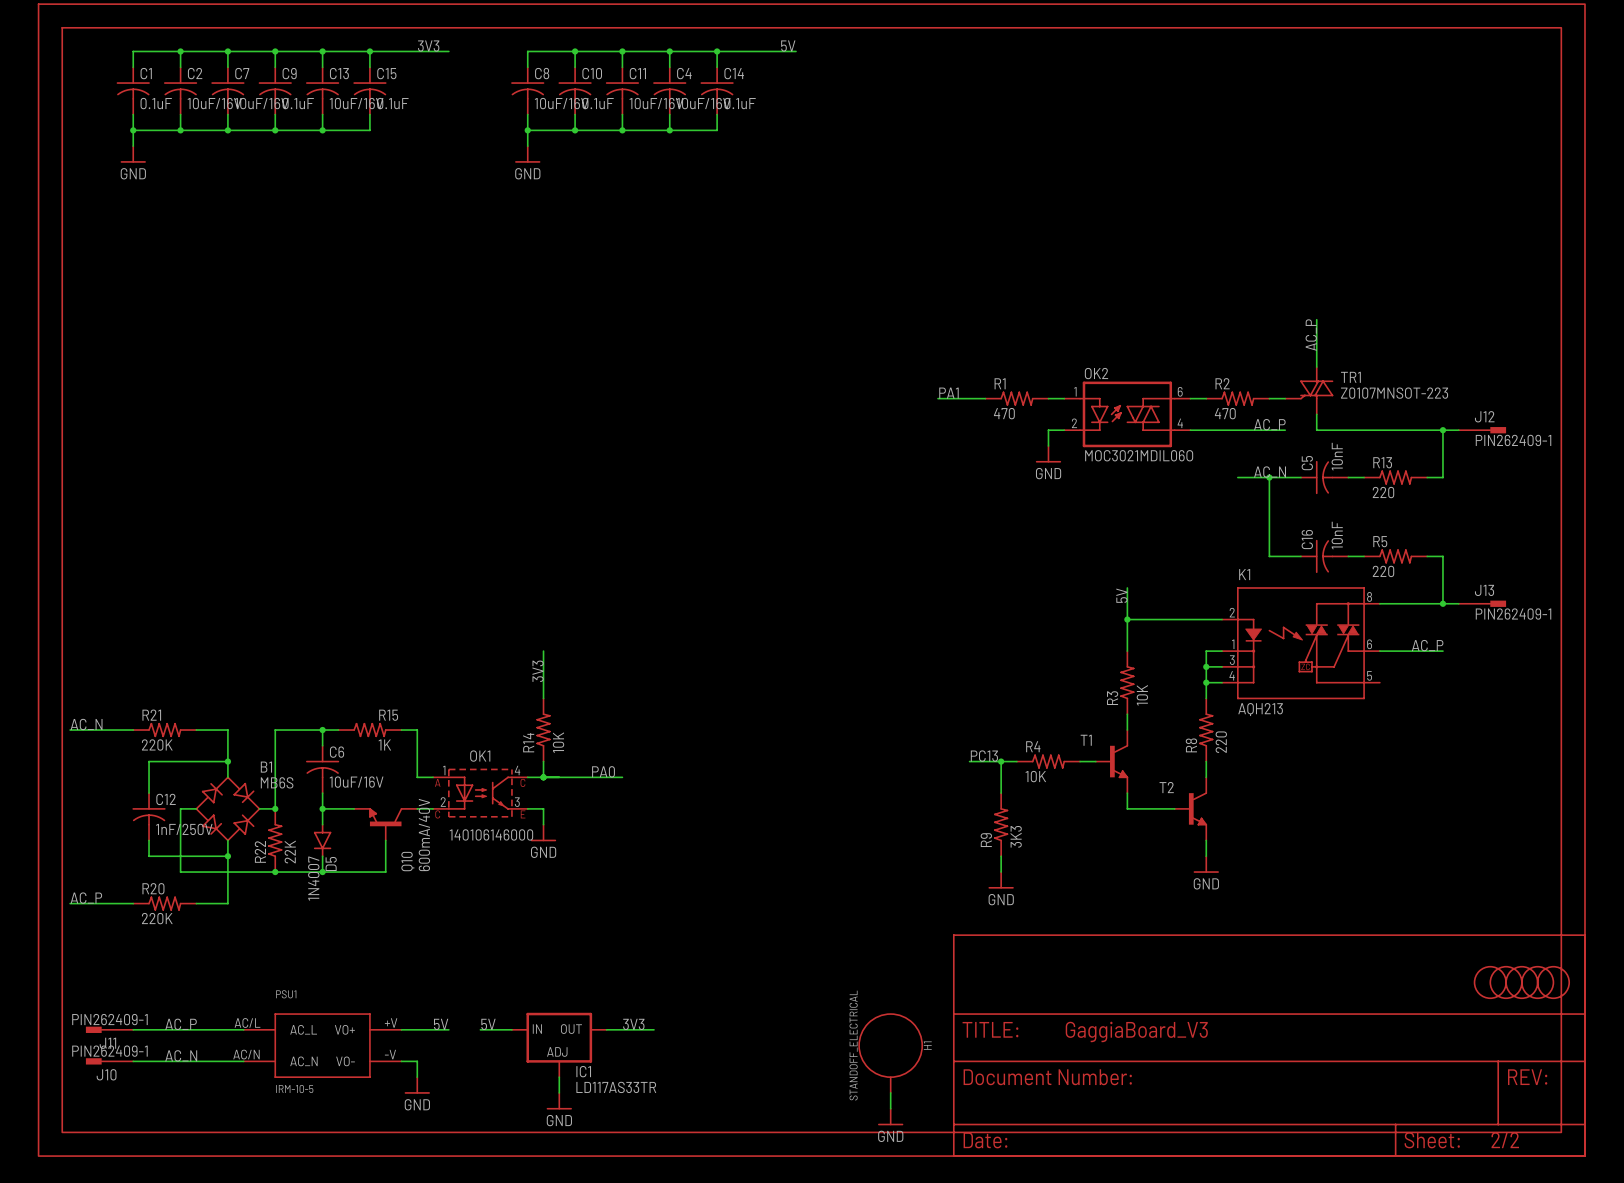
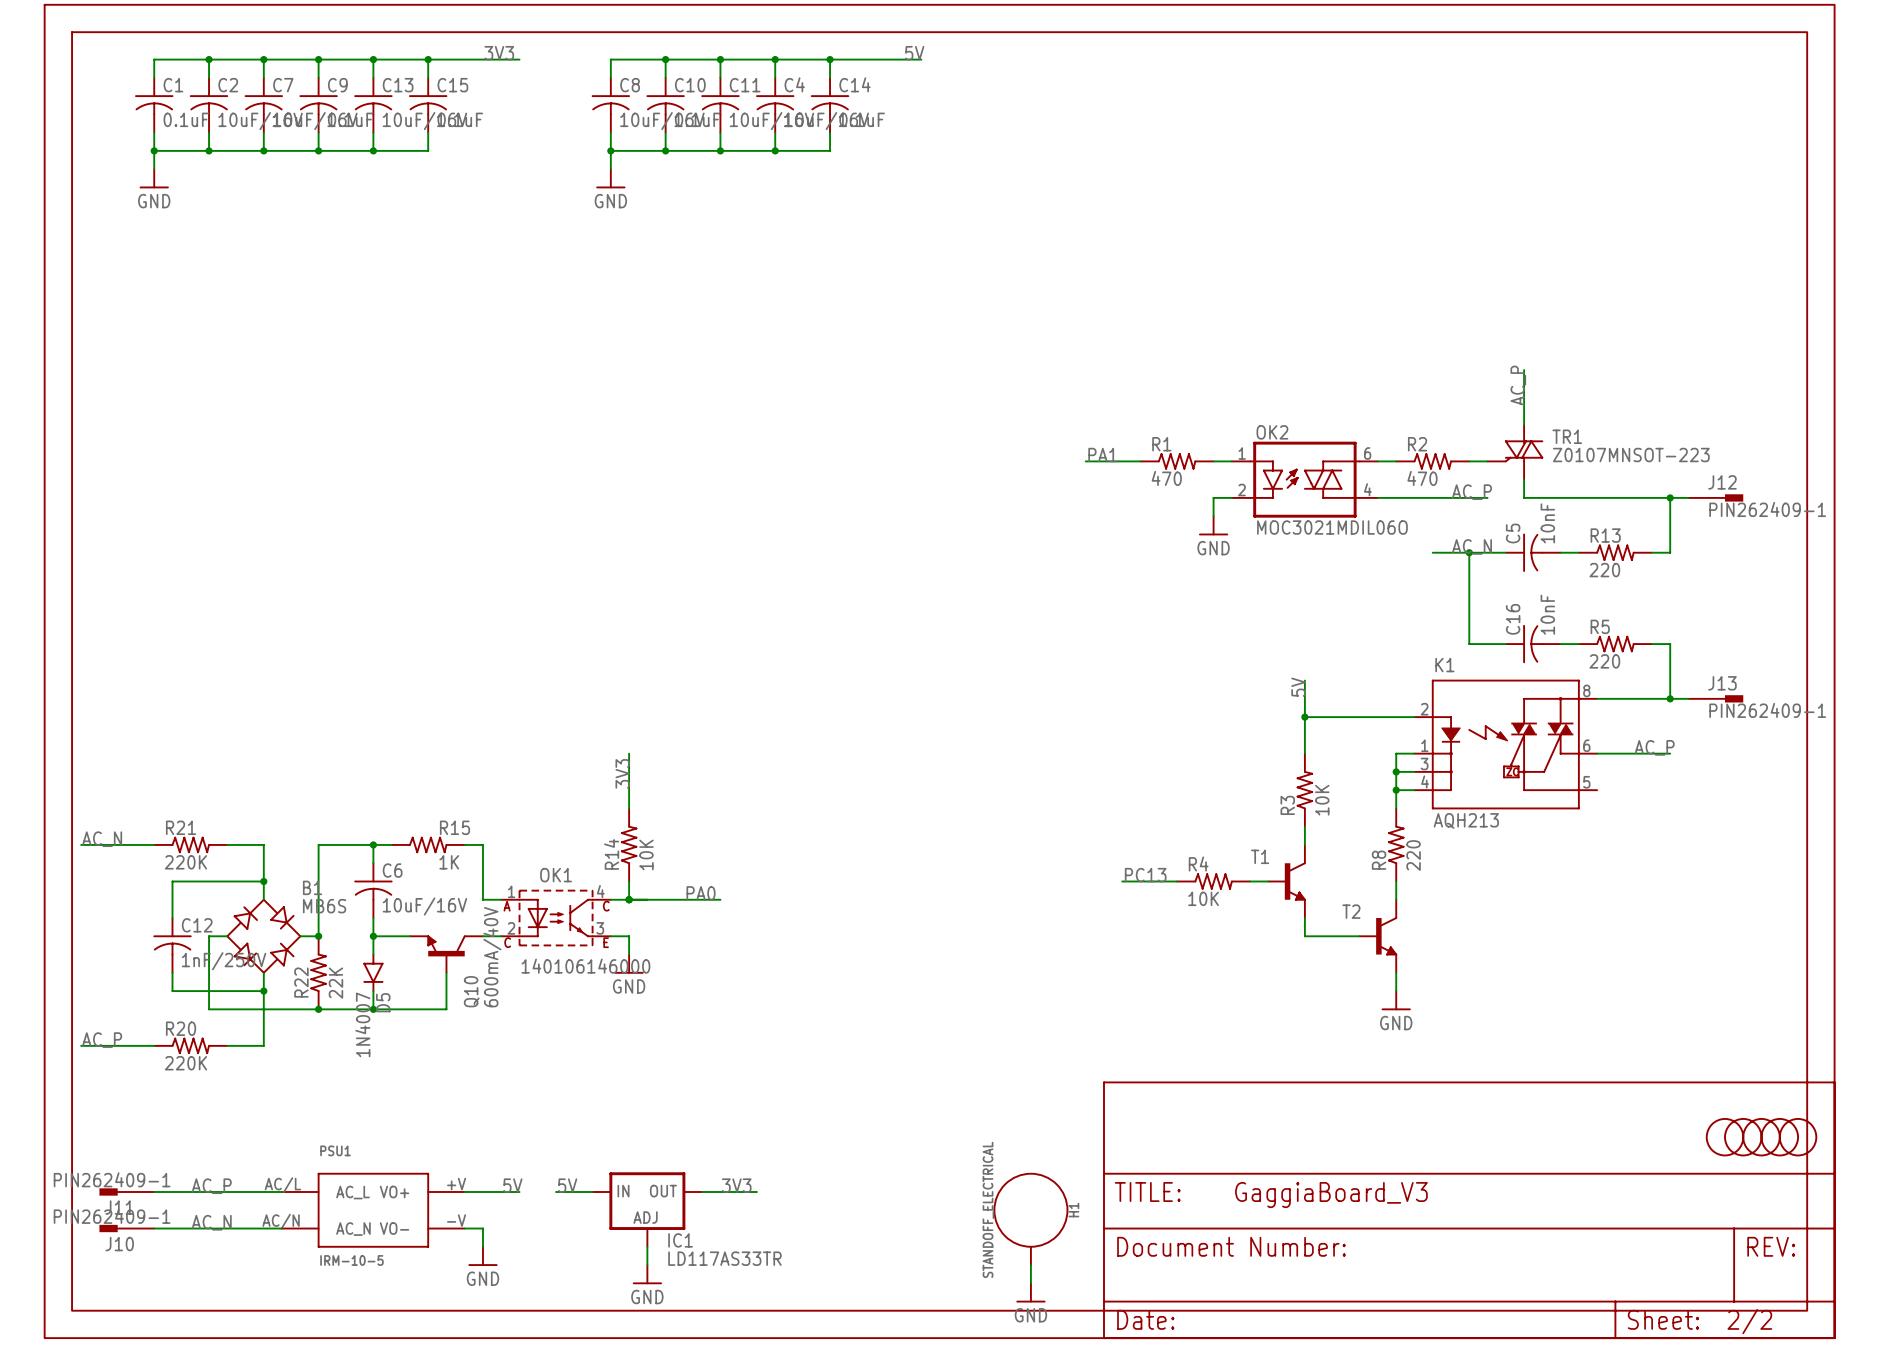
wire: (1001, 761) (1001, 793) -> none
junction: (1001, 761) -> none
R9: 3K3 (1001, 824) -> none
wire: (1001, 856) (1001, 872) -> none
power symbol: GND (1001, 880) -> none

